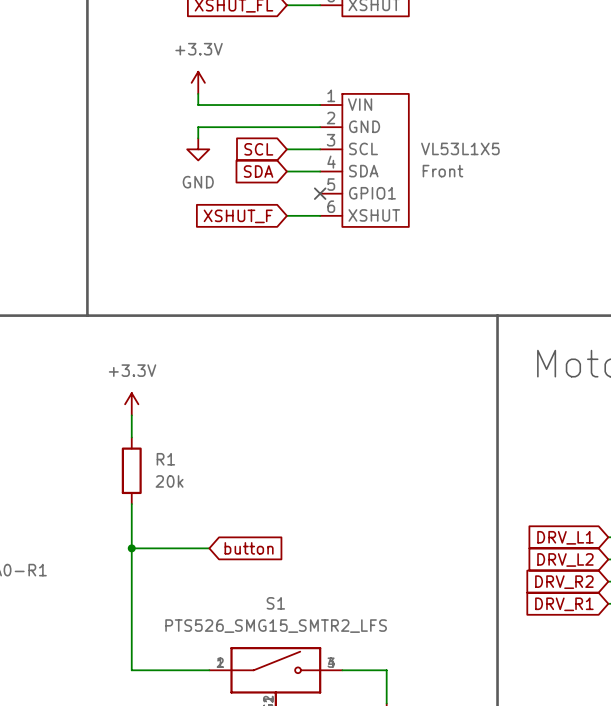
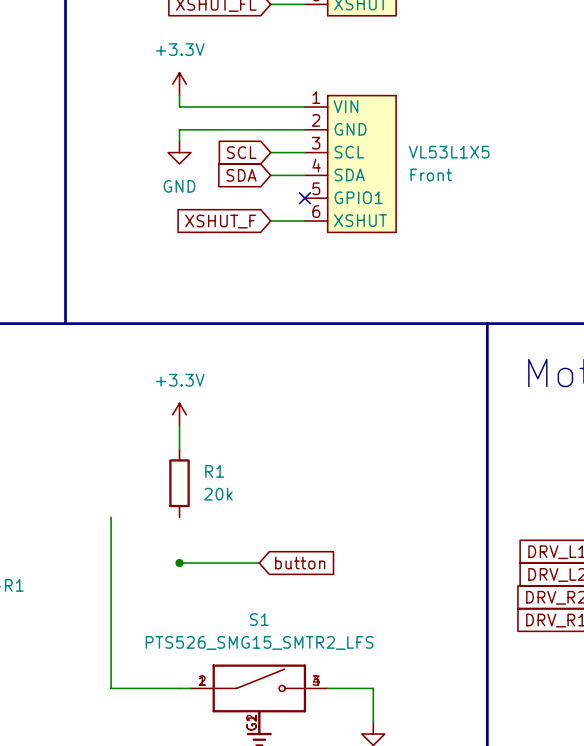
power symbol position: +3.3V (131, 404) -> +3.3V (179, 414)
wire: (131, 415) (131, 437) -> (179, 426) (179, 449)
R1 position: (131, 470) -> (179, 483)
wire: (131, 548) (198, 548) -> (190, 563) (259, 563)
junction: (131, 548) -> none
junction: none -> (179, 563)
global label position: button (249, 548) -> button (300, 563)

